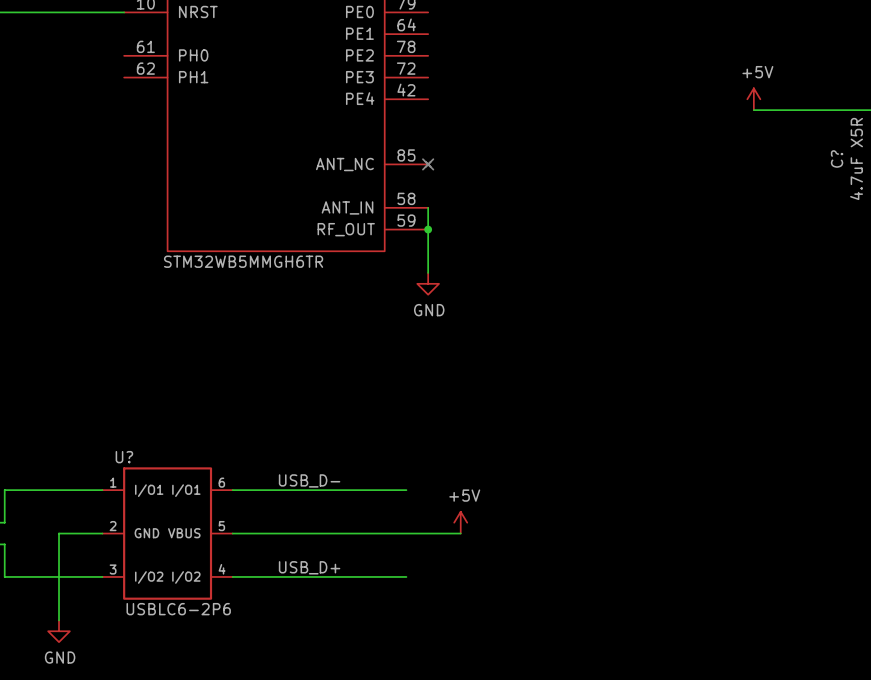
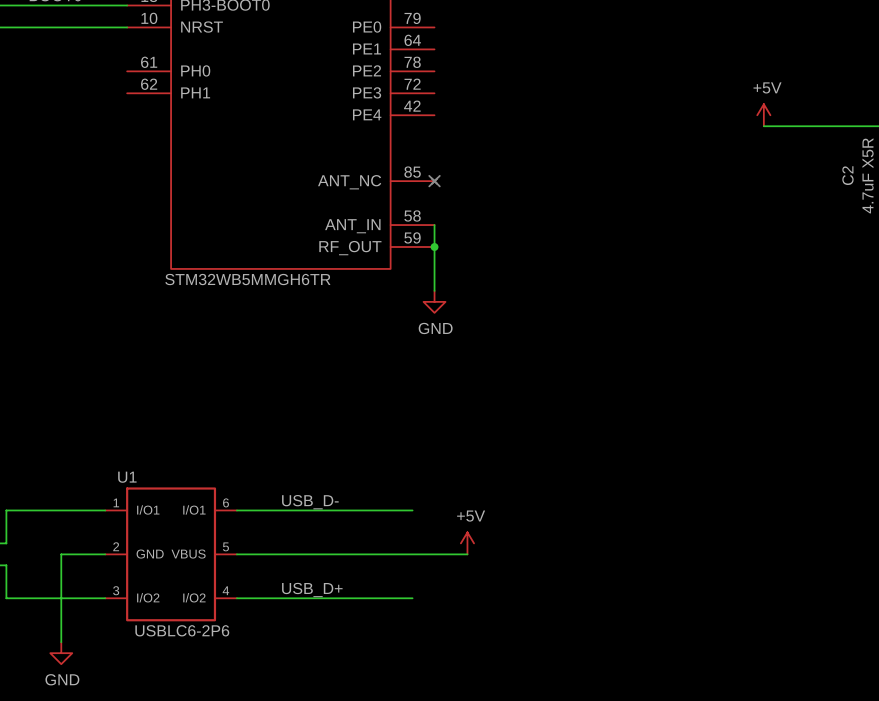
C? name: C? (837, 158) -> C2 (847, 175)
U? name: U? (124, 457) -> U1 (127, 477)

